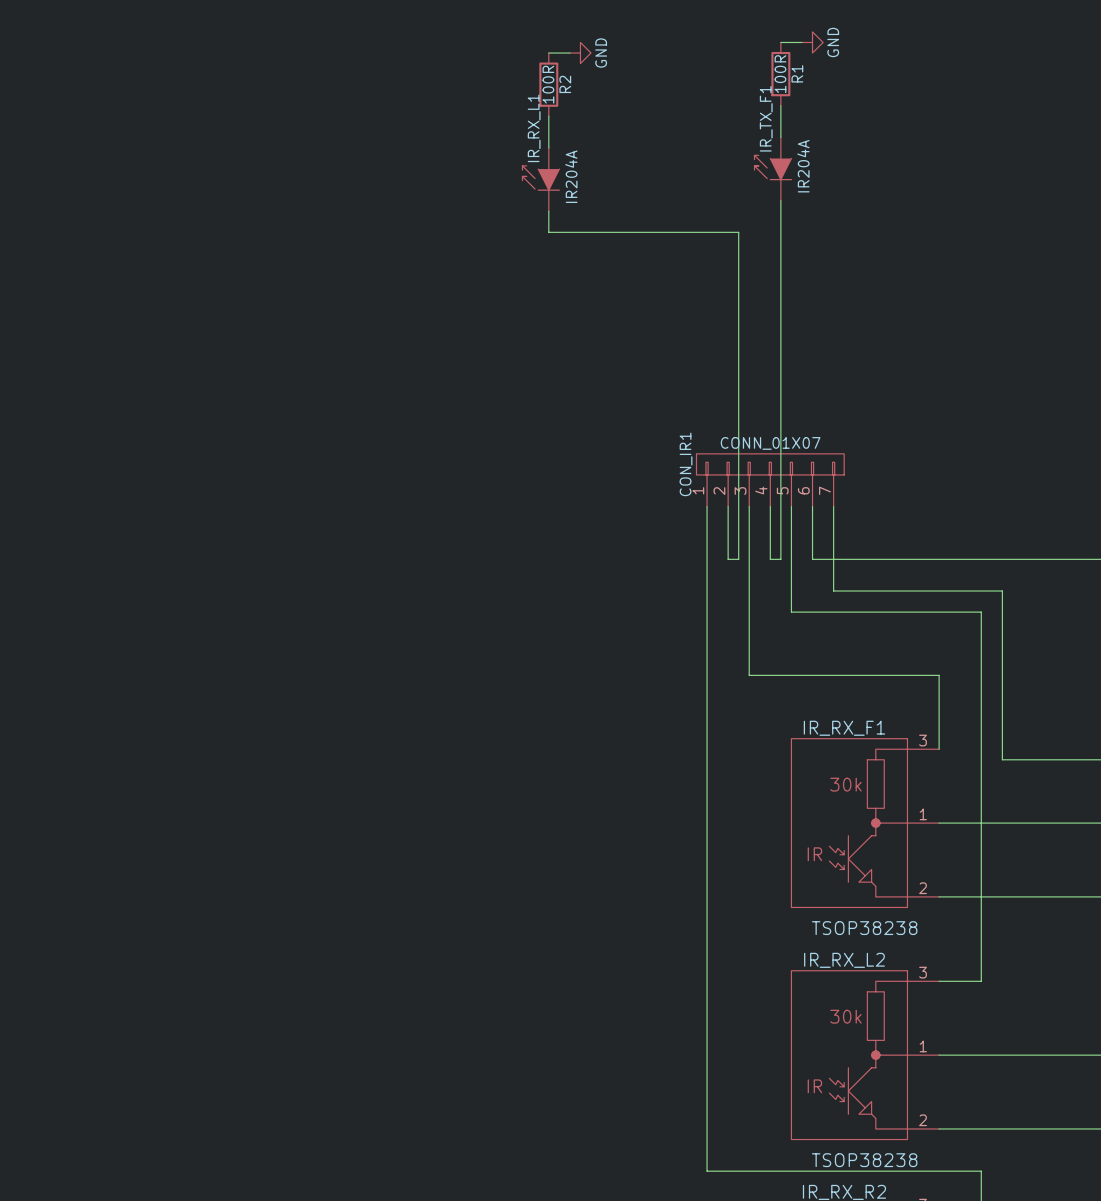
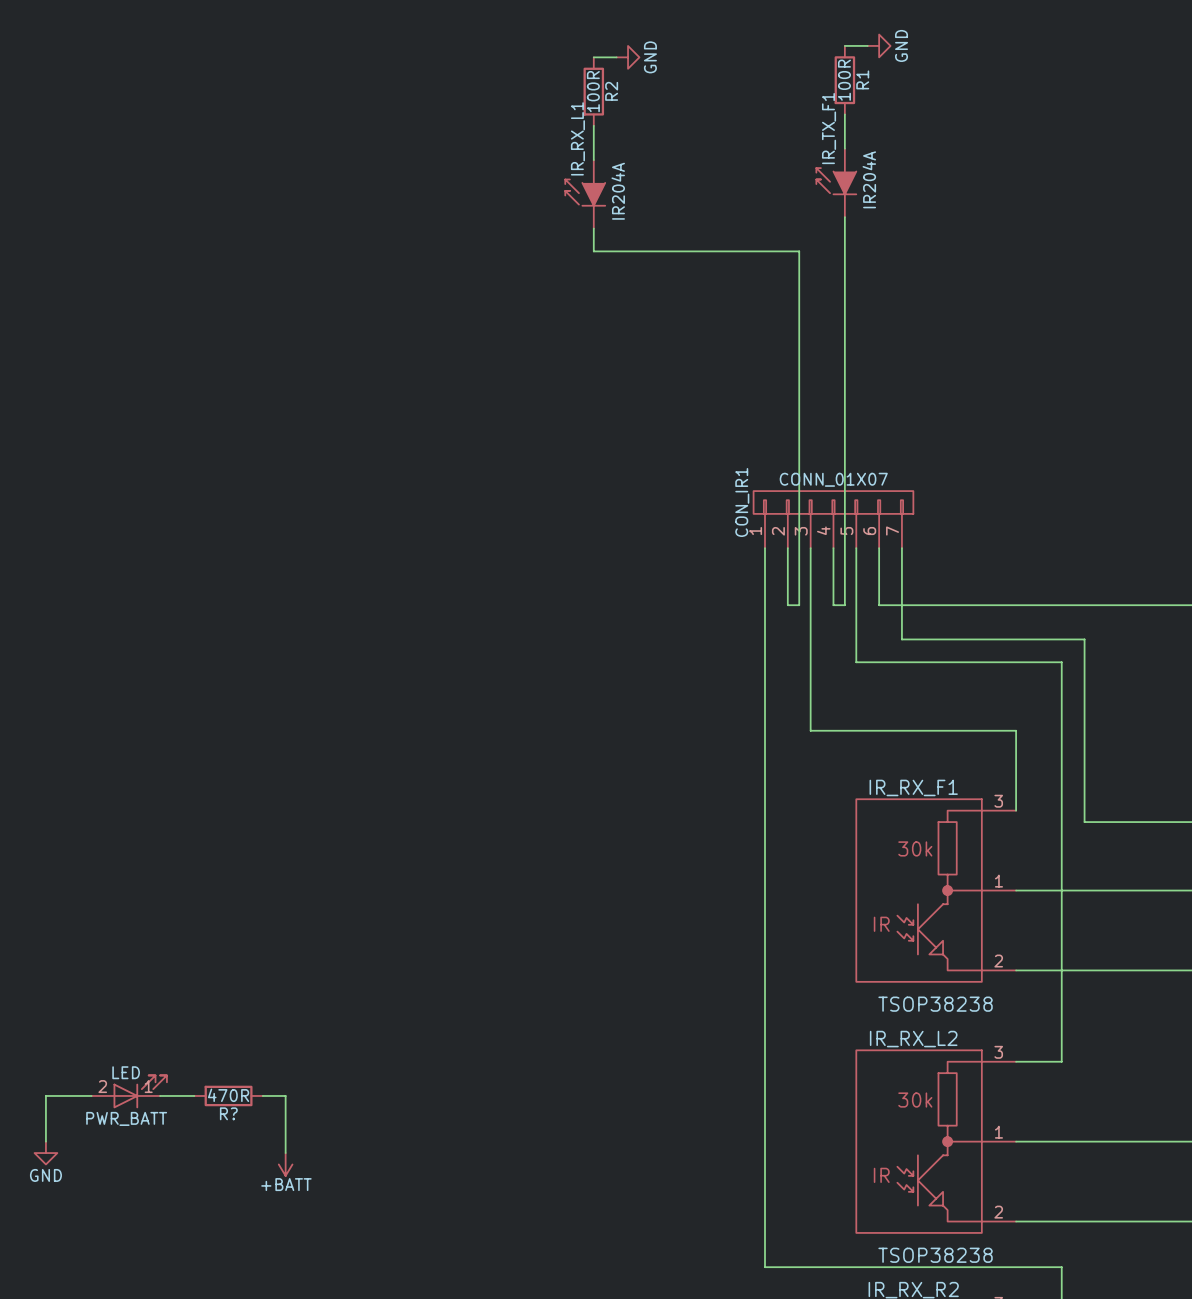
PWR_BATT: none -> LED (129, 1091)
wire: none -> (91, 1095) (45, 1095) (45, 1141)
wire: none -> (160, 1095) (194, 1095)
R?: none -> 470R (228, 1095)
wire: none -> (262, 1095) (285, 1095) (285, 1153)
power symbol: none -> GND (45, 1153)
power symbol: none -> +BATT (285, 1164)

